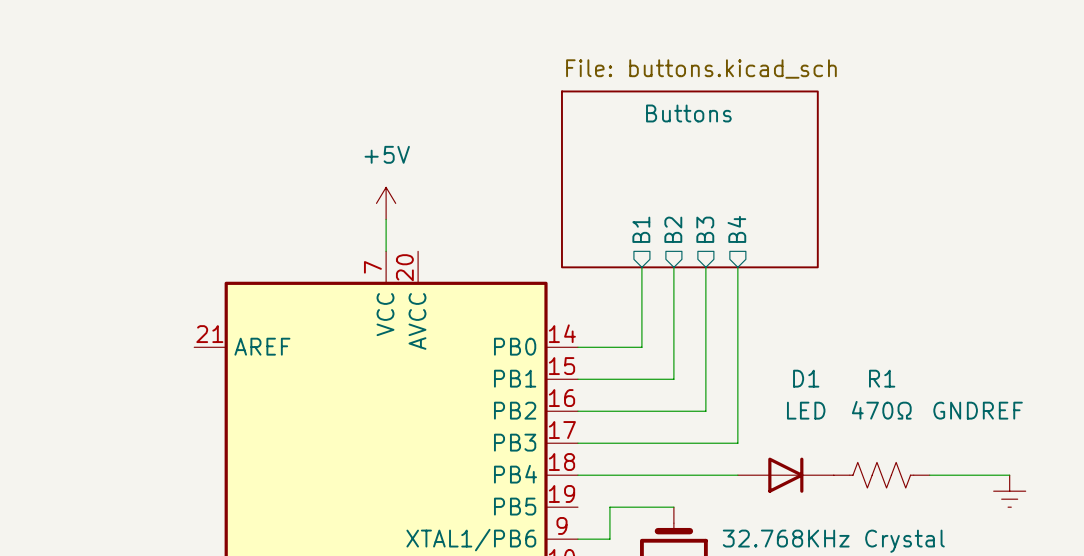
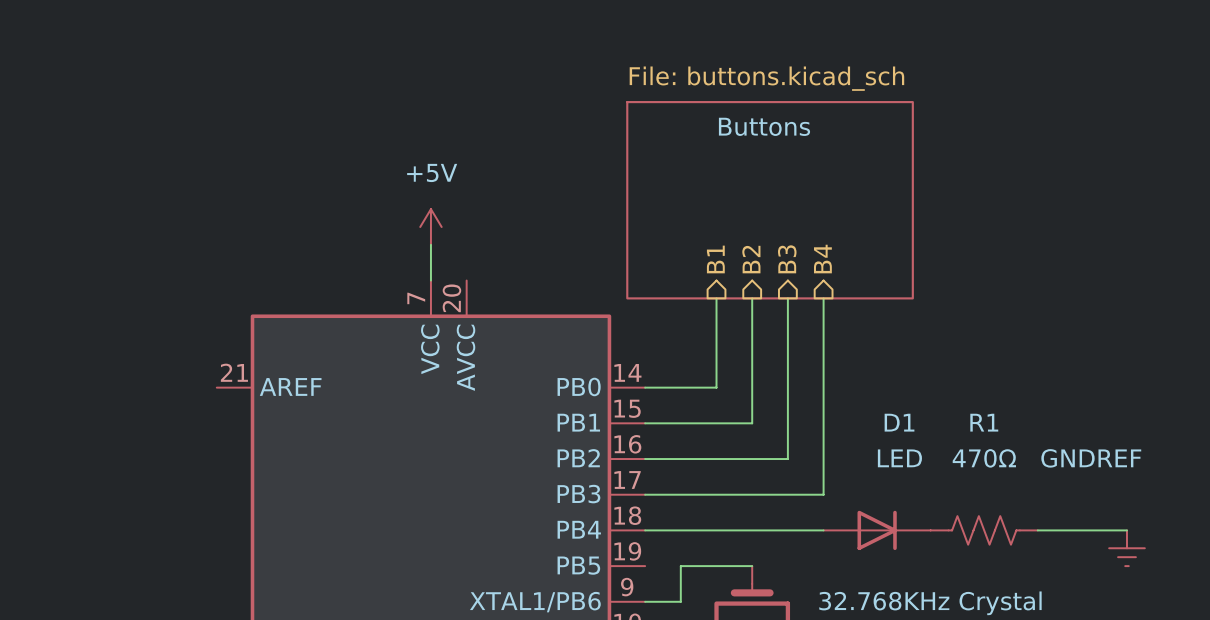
sheet pin: B1 (641, 229) -> none
hierarchical label: none -> B1 (715, 259)
sheet pin: B2 (673, 229) -> none
hierarchical label: none -> B2 (751, 259)
sheet pin: B3 (705, 229) -> none
hierarchical label: none -> B3 (787, 259)
sheet pin: B4 (736, 229) -> none
hierarchical label: none -> B4 (822, 259)

